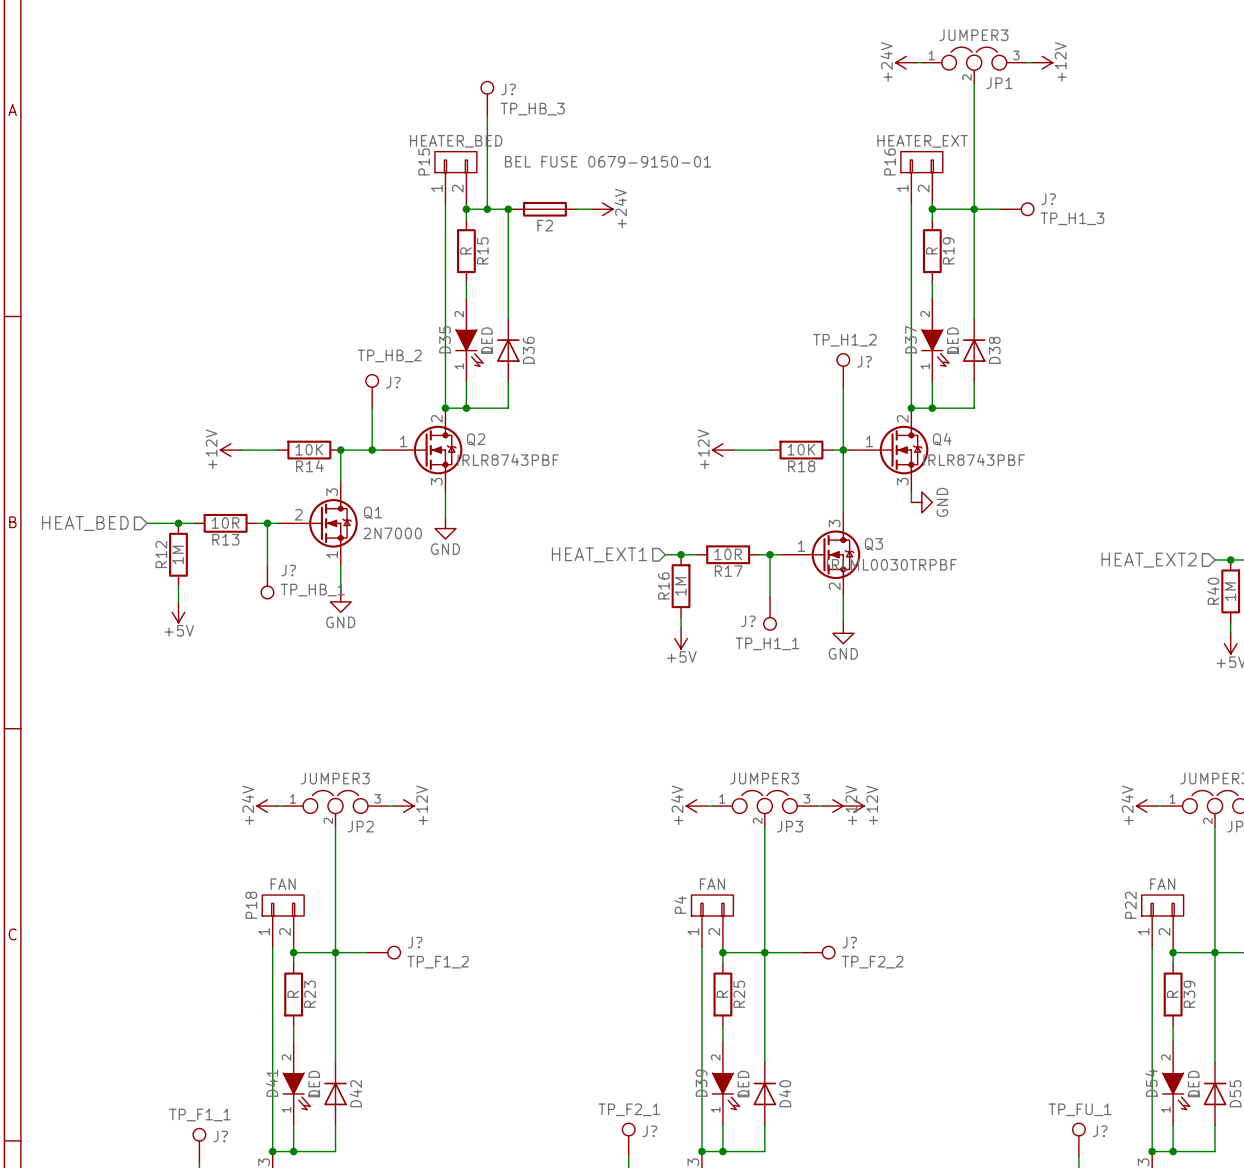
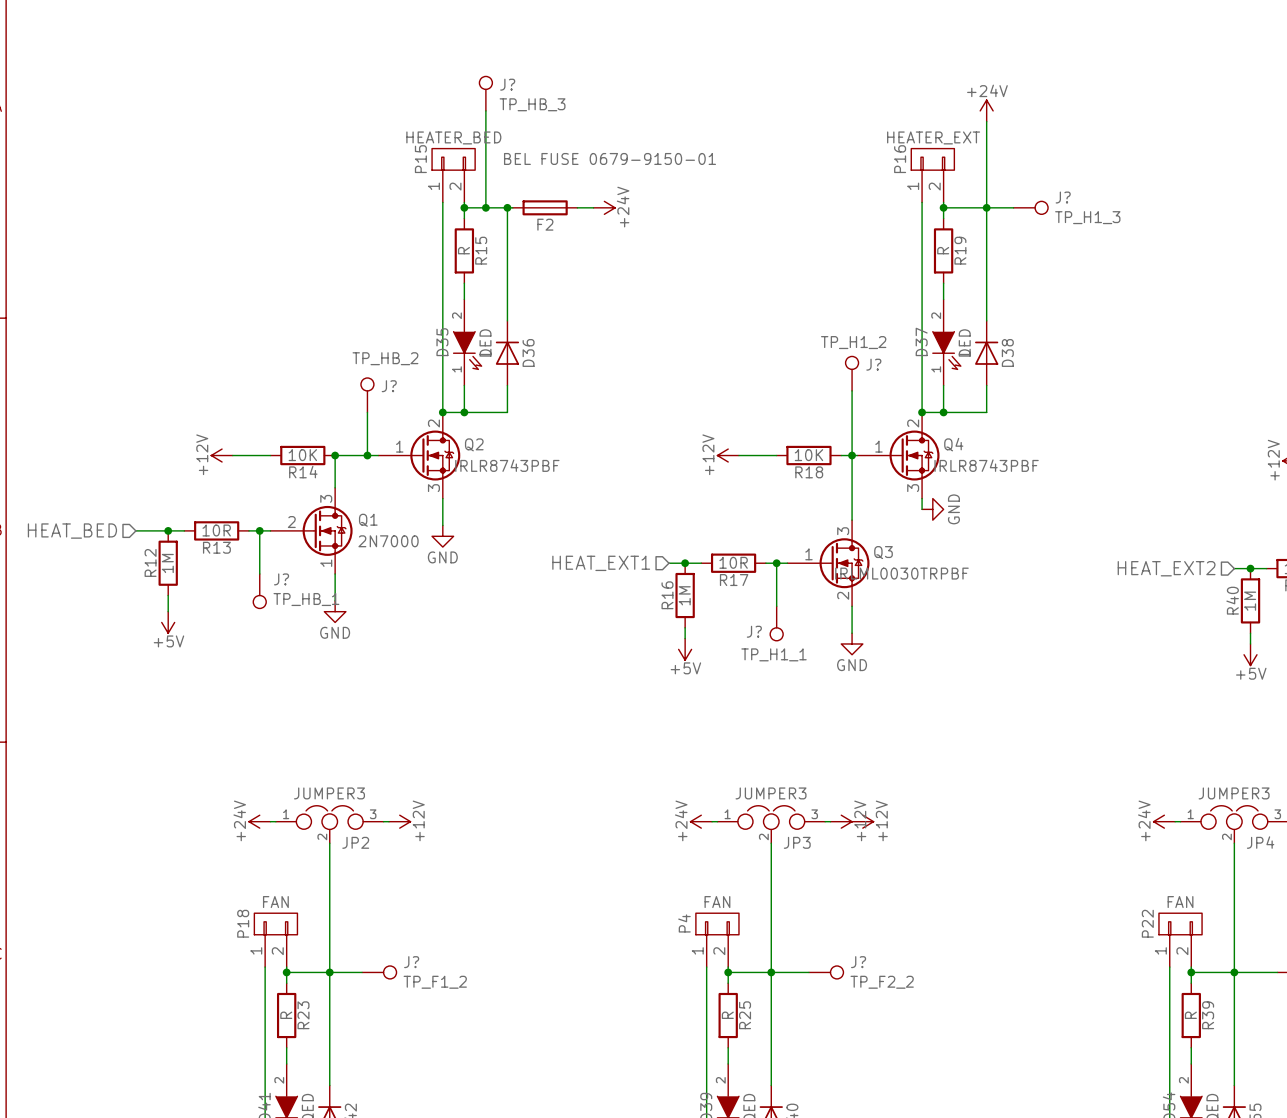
power symbol rotation: 0° (906, 62) -> 90° clockwise (986, 110)
power symbol position: +24V (906, 62) -> +24V (986, 110)
wire: (916, 62) (921, 62) -> none
wire: (1026, 62) (1031, 62) -> none
power symbol: +12V (1042, 62) -> none
JP1: JUMPER3 (974, 65) -> none

